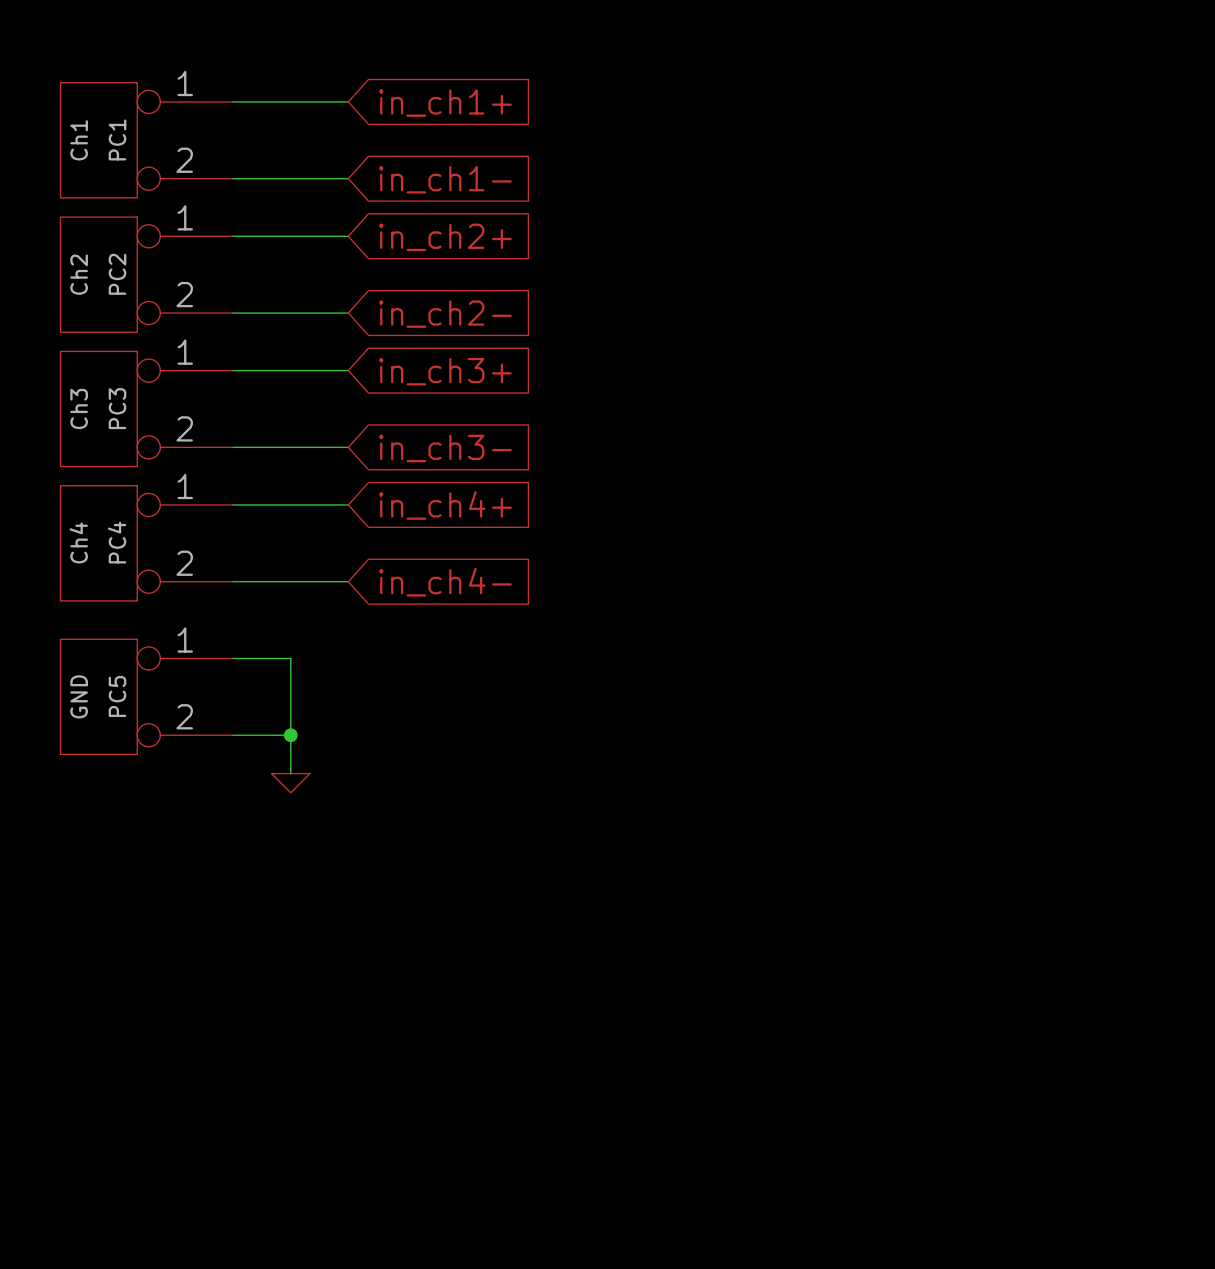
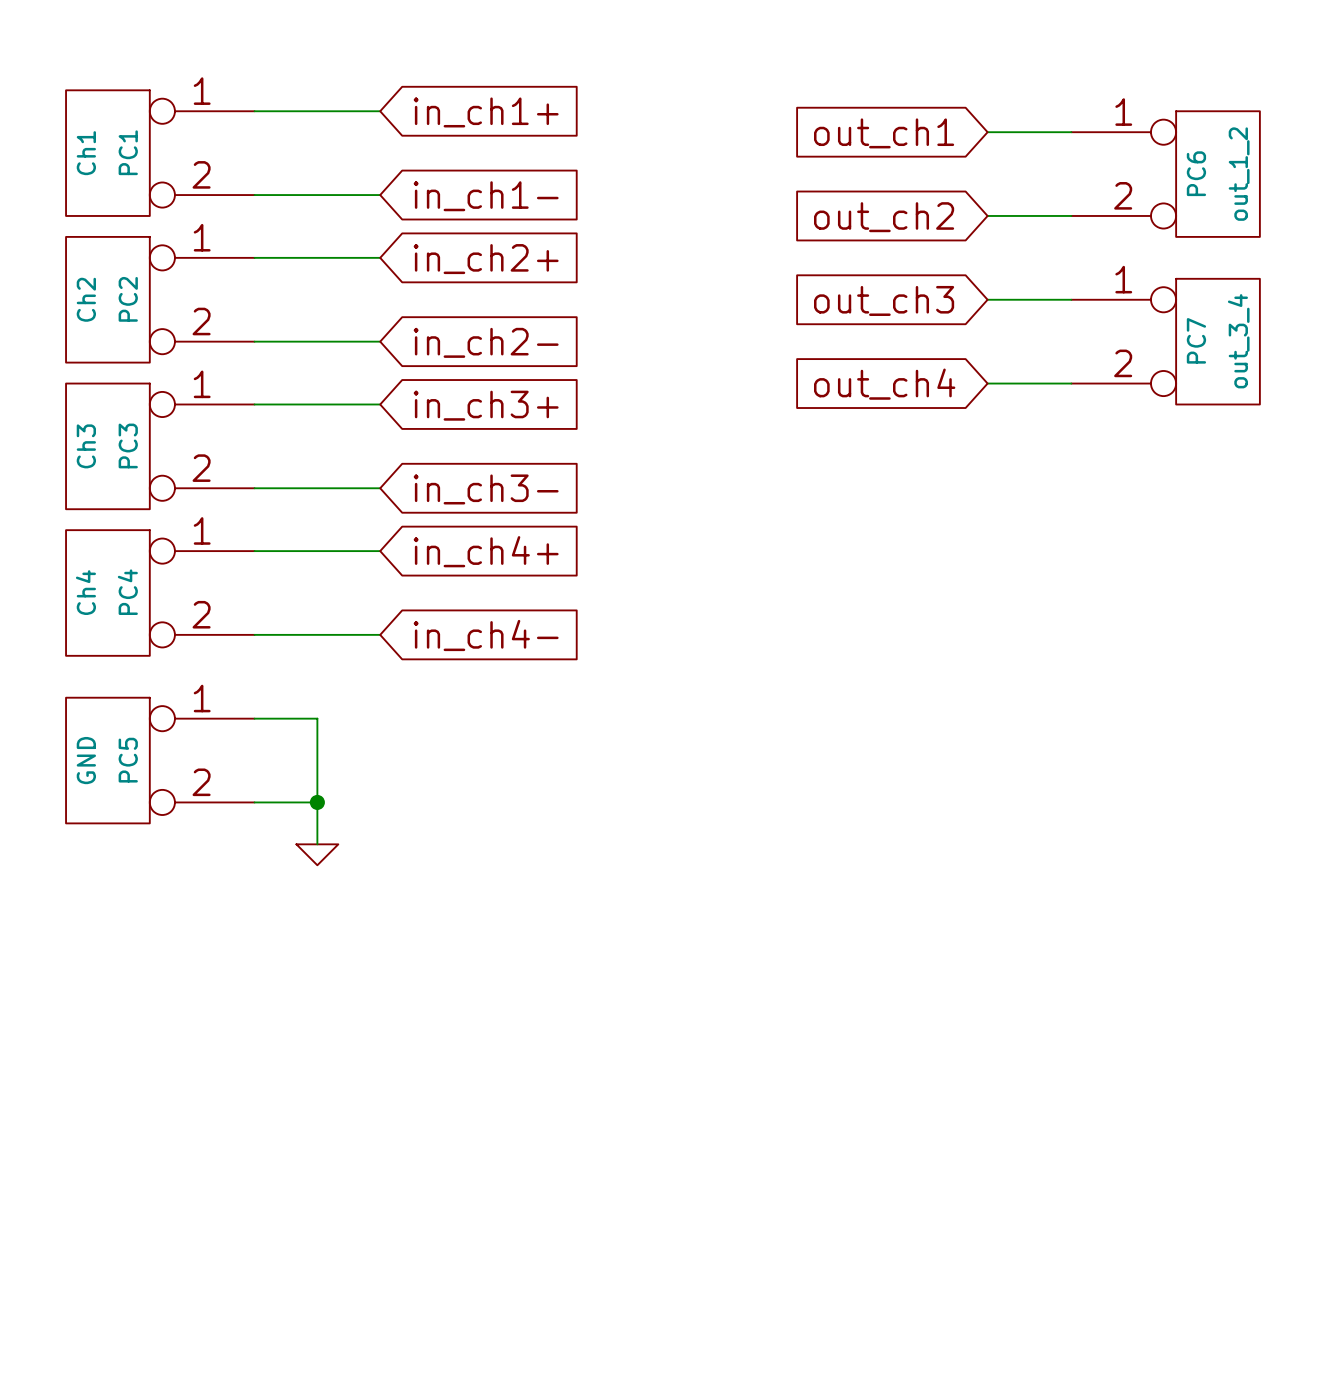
wire: none -> (987, 132) (1071, 132)
global label: none -> out_ch1 (884, 133)
PC6: none -> out_1_2 (1165, 174)
wire: none -> (987, 215) (1071, 215)
global label: none -> out_ch2 (884, 217)
wire: none -> (987, 299) (1071, 299)
global label: none -> out_ch3 (884, 300)
PC7: none -> out_3_4 (1165, 341)
global label: none -> out_ch4 (884, 384)
wire: none -> (987, 383) (1071, 383)

